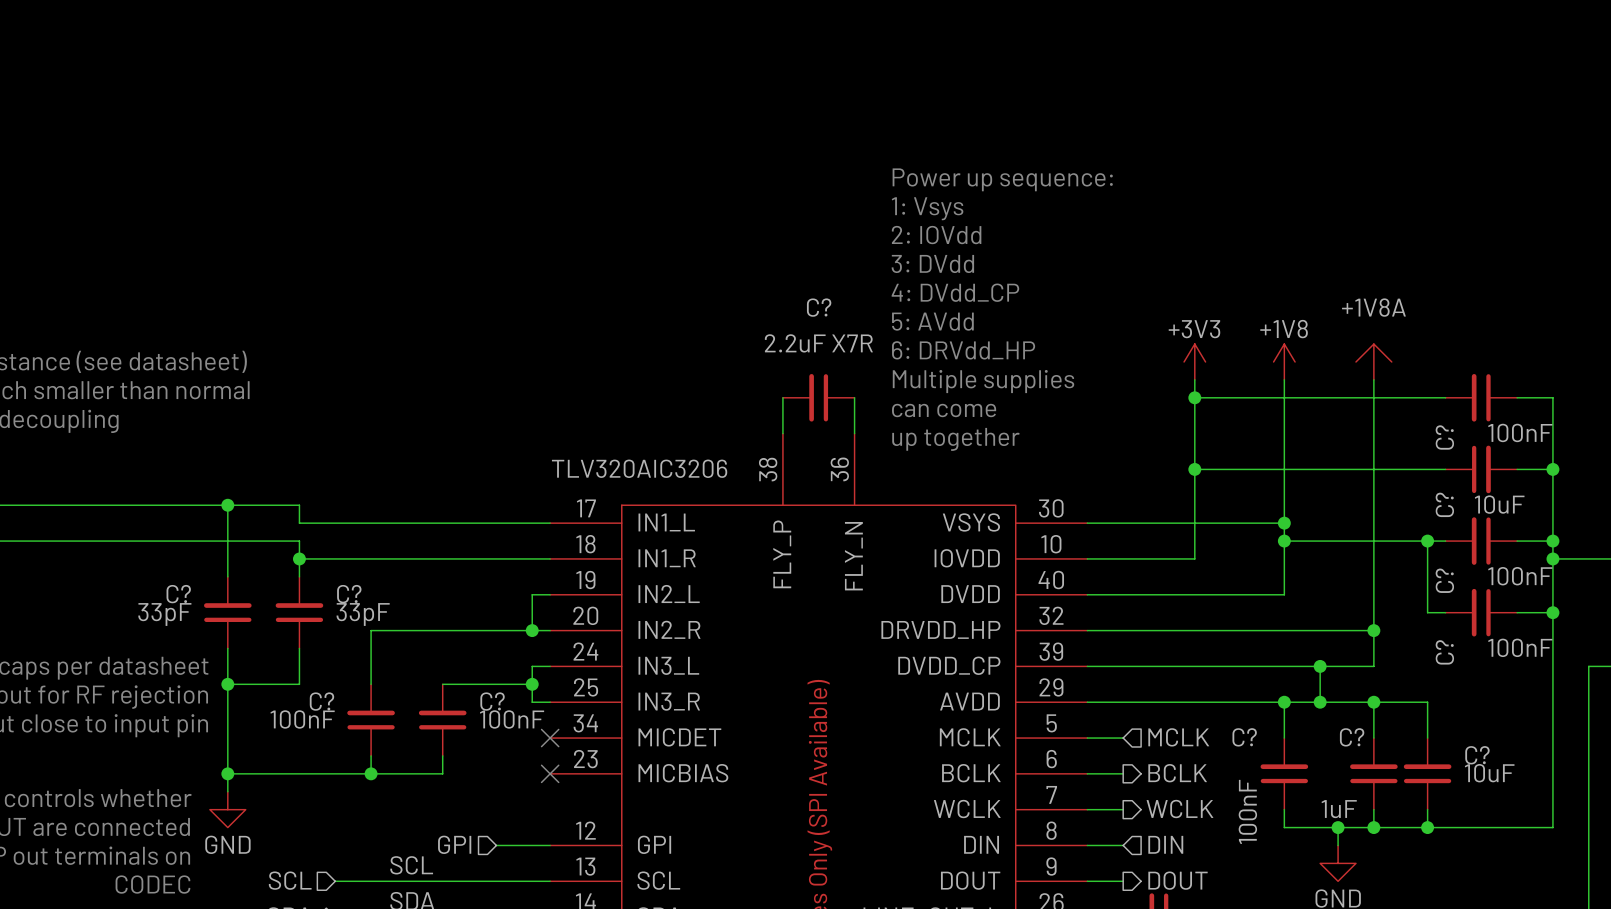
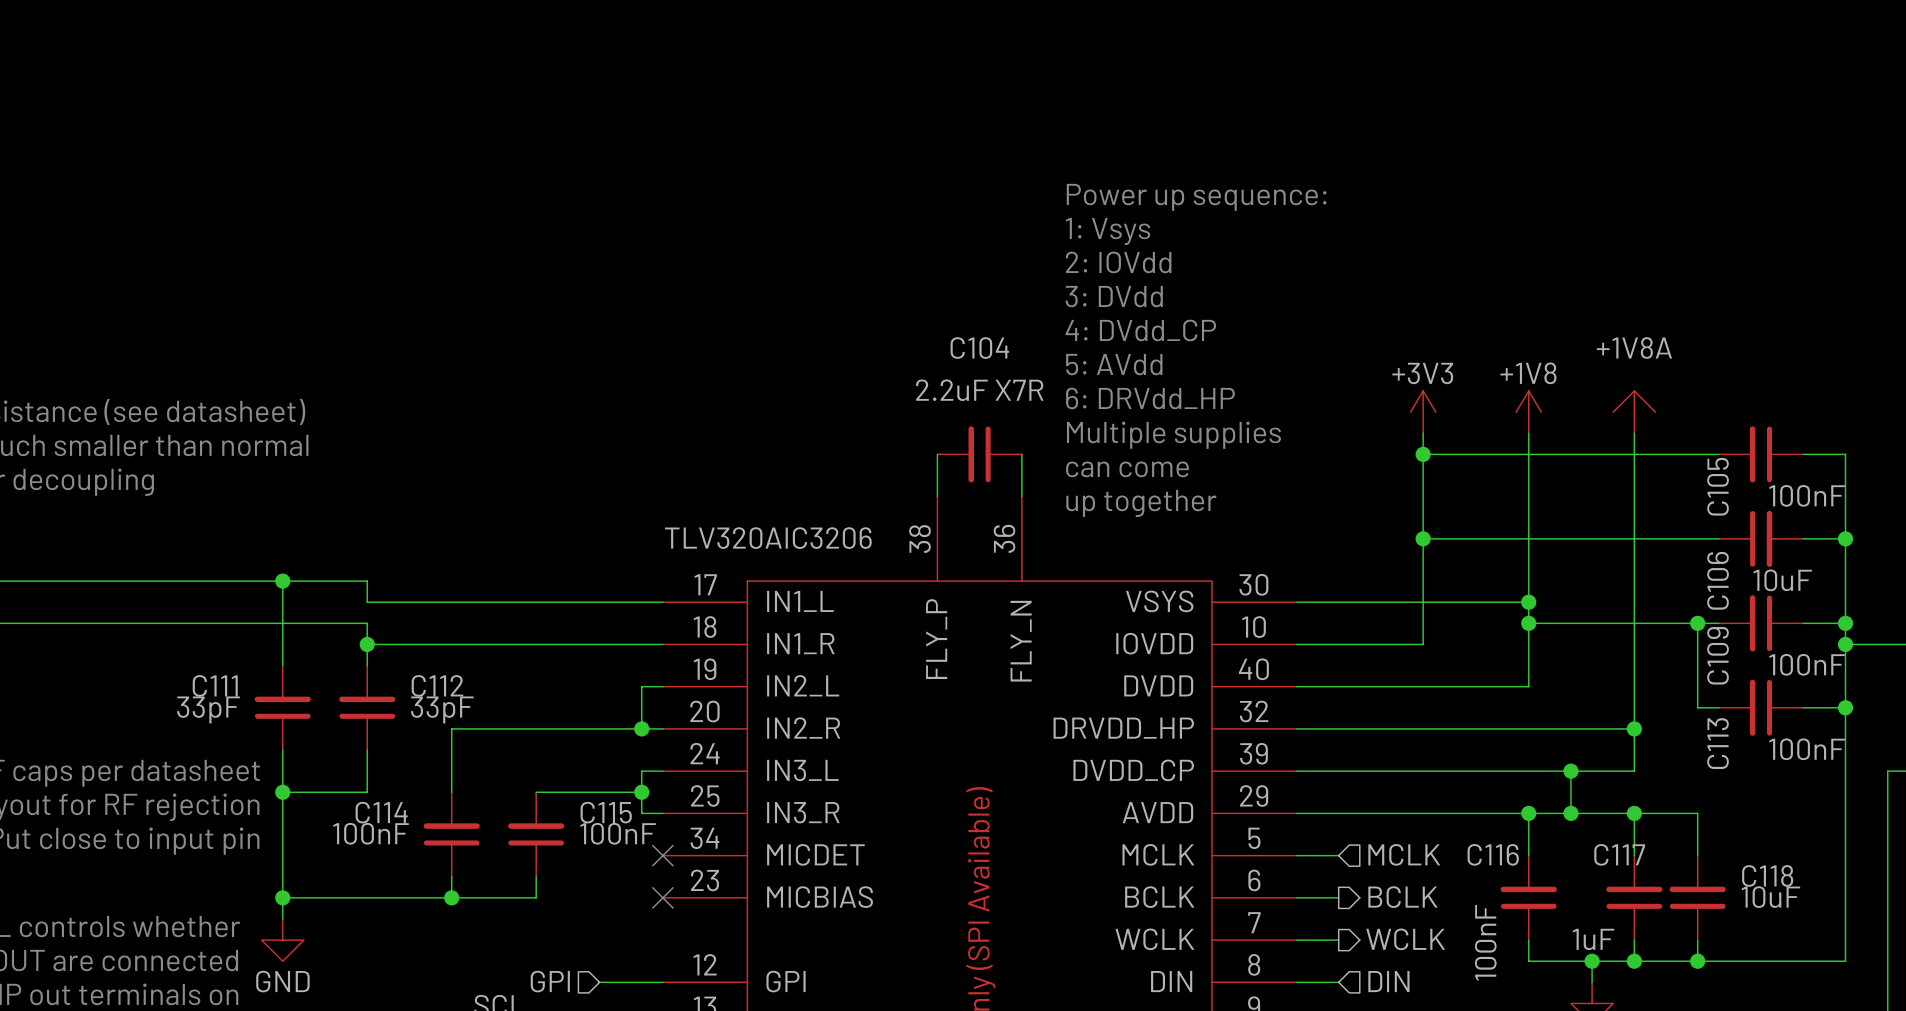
C? name: C? (819, 307) -> C104 (979, 348)
C? name: C? (1444, 437) -> C105 (1718, 486)
C? name: C? (1444, 504) -> C106 (1718, 580)
C? name: C? (1444, 580) -> C109 (1718, 655)
C? name: C? (178, 594) -> C111 (215, 685)
C? name: C? (349, 594) -> C112 (437, 685)
C? name: C? (1444, 652) -> C113 (1718, 743)
C? name: C? (321, 701) -> C114 (381, 812)
C? name: C? (492, 701) -> C115 (606, 812)
C? name: C? (1244, 737) -> C116 (1493, 854)
C? name: C? (1352, 737) -> C117 (1619, 854)
C? name: C? (1477, 755) -> C118 (1767, 875)

